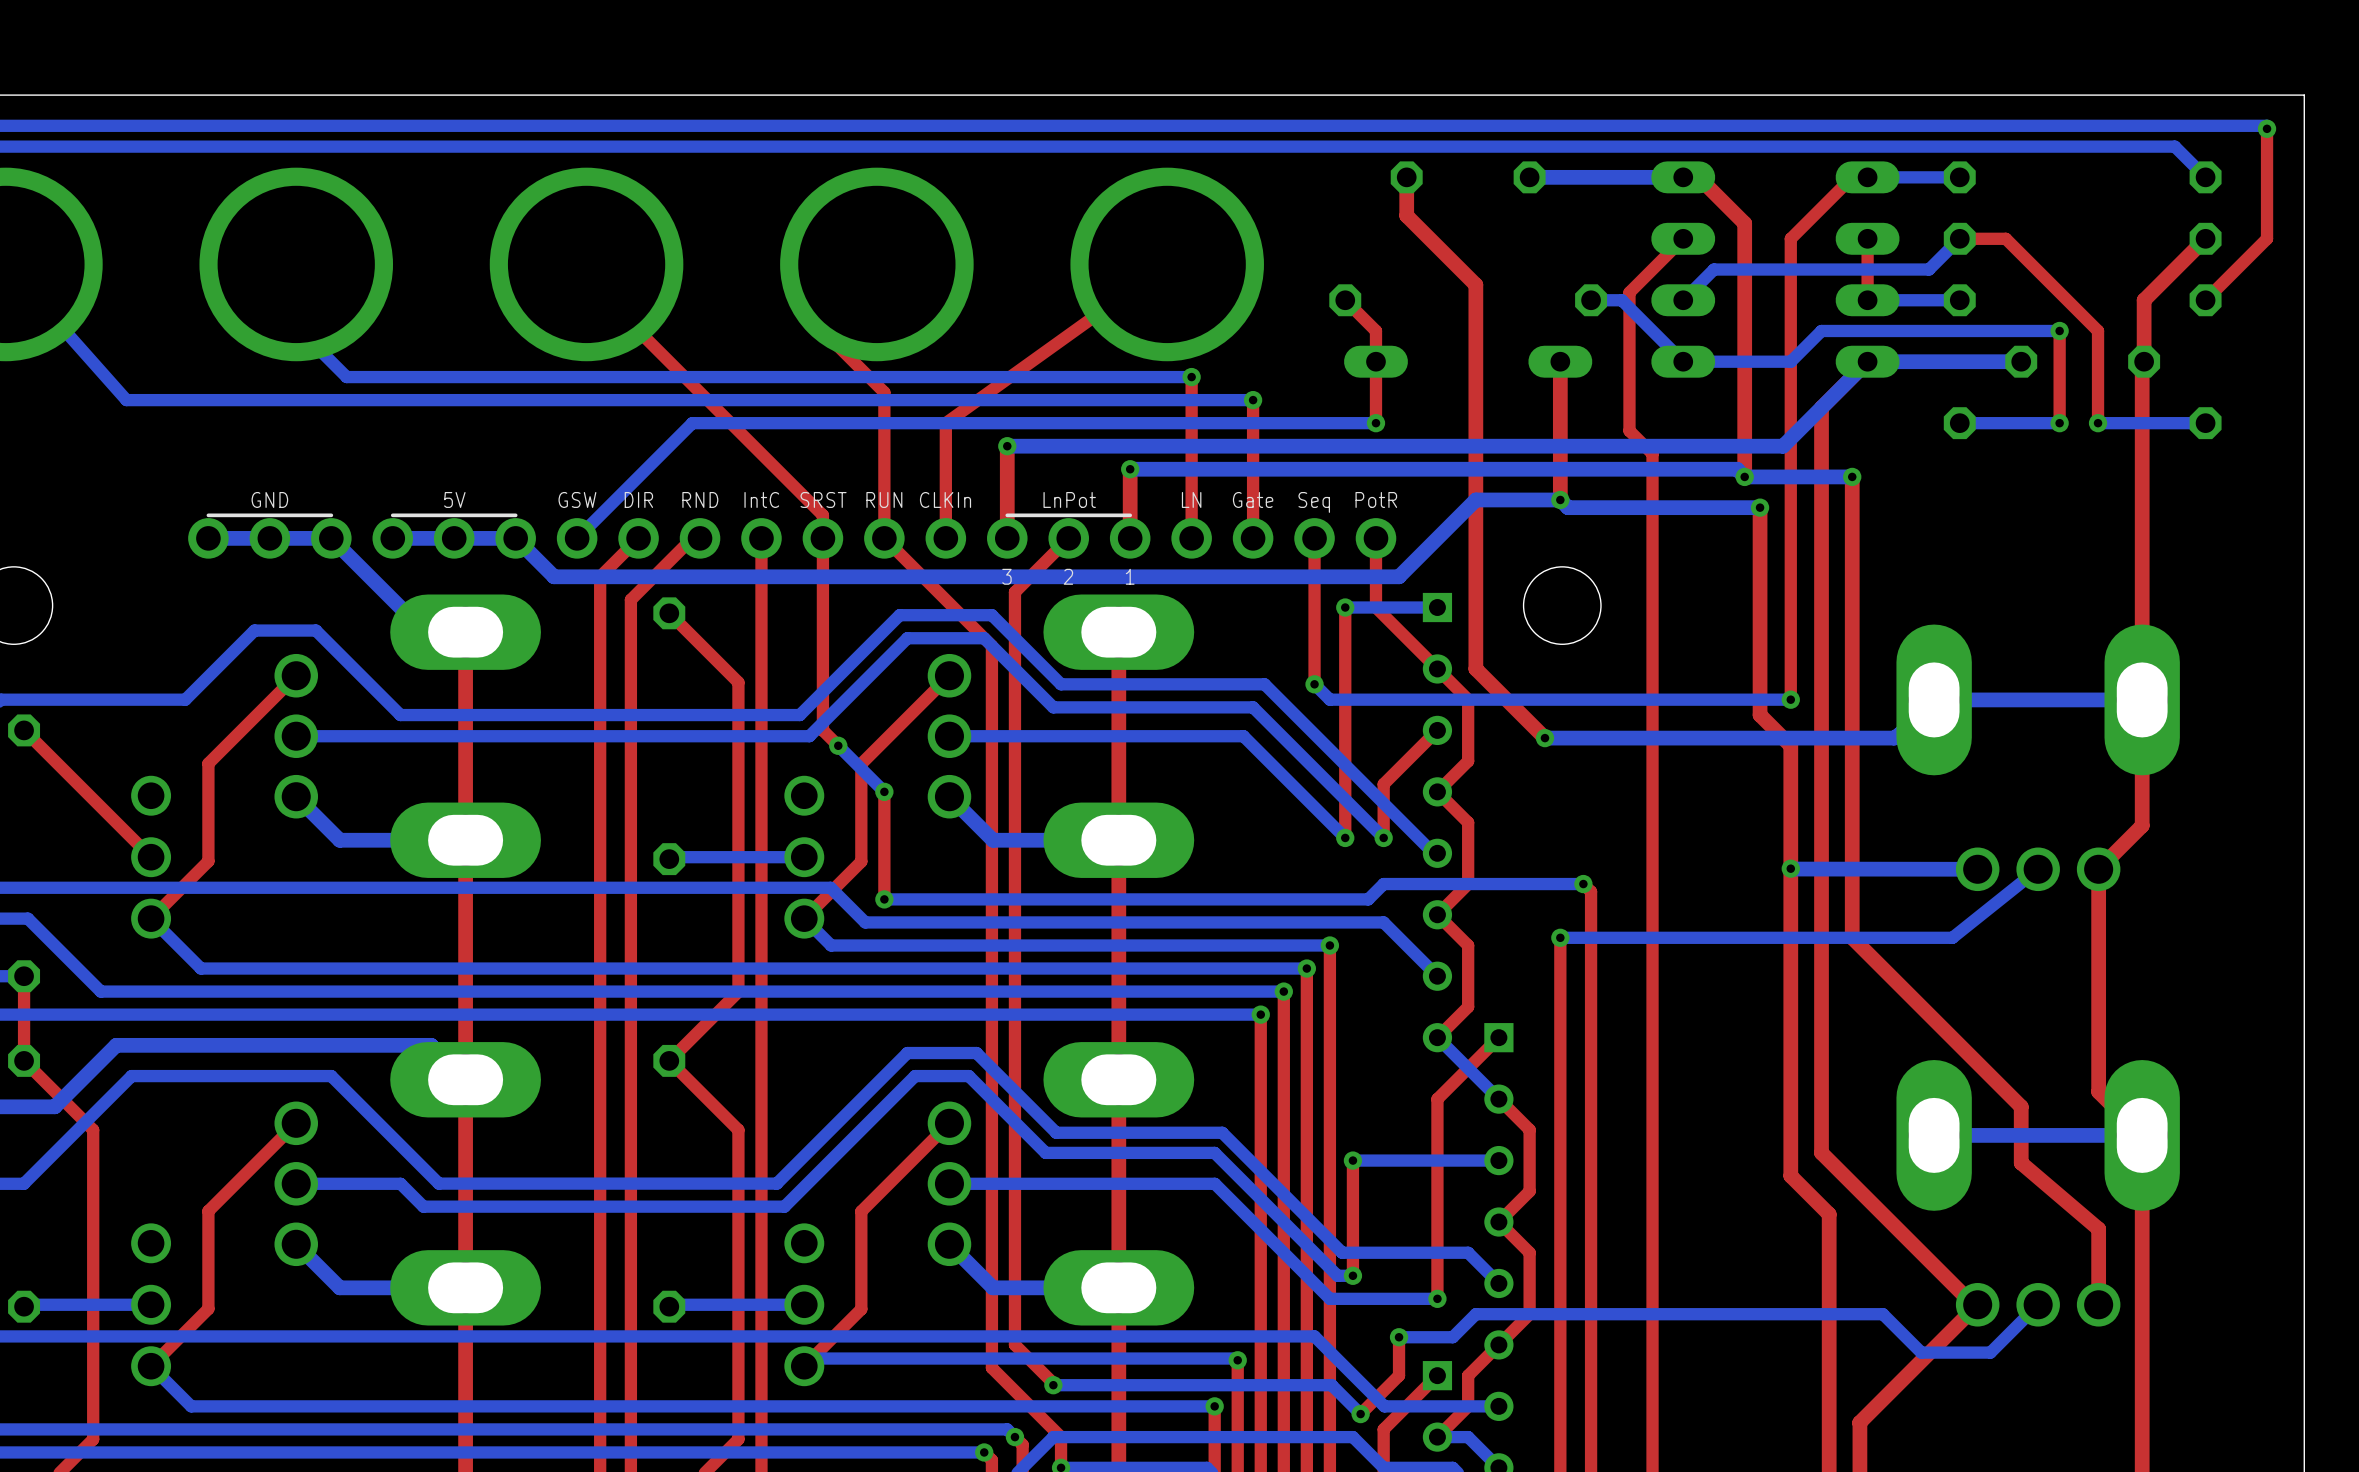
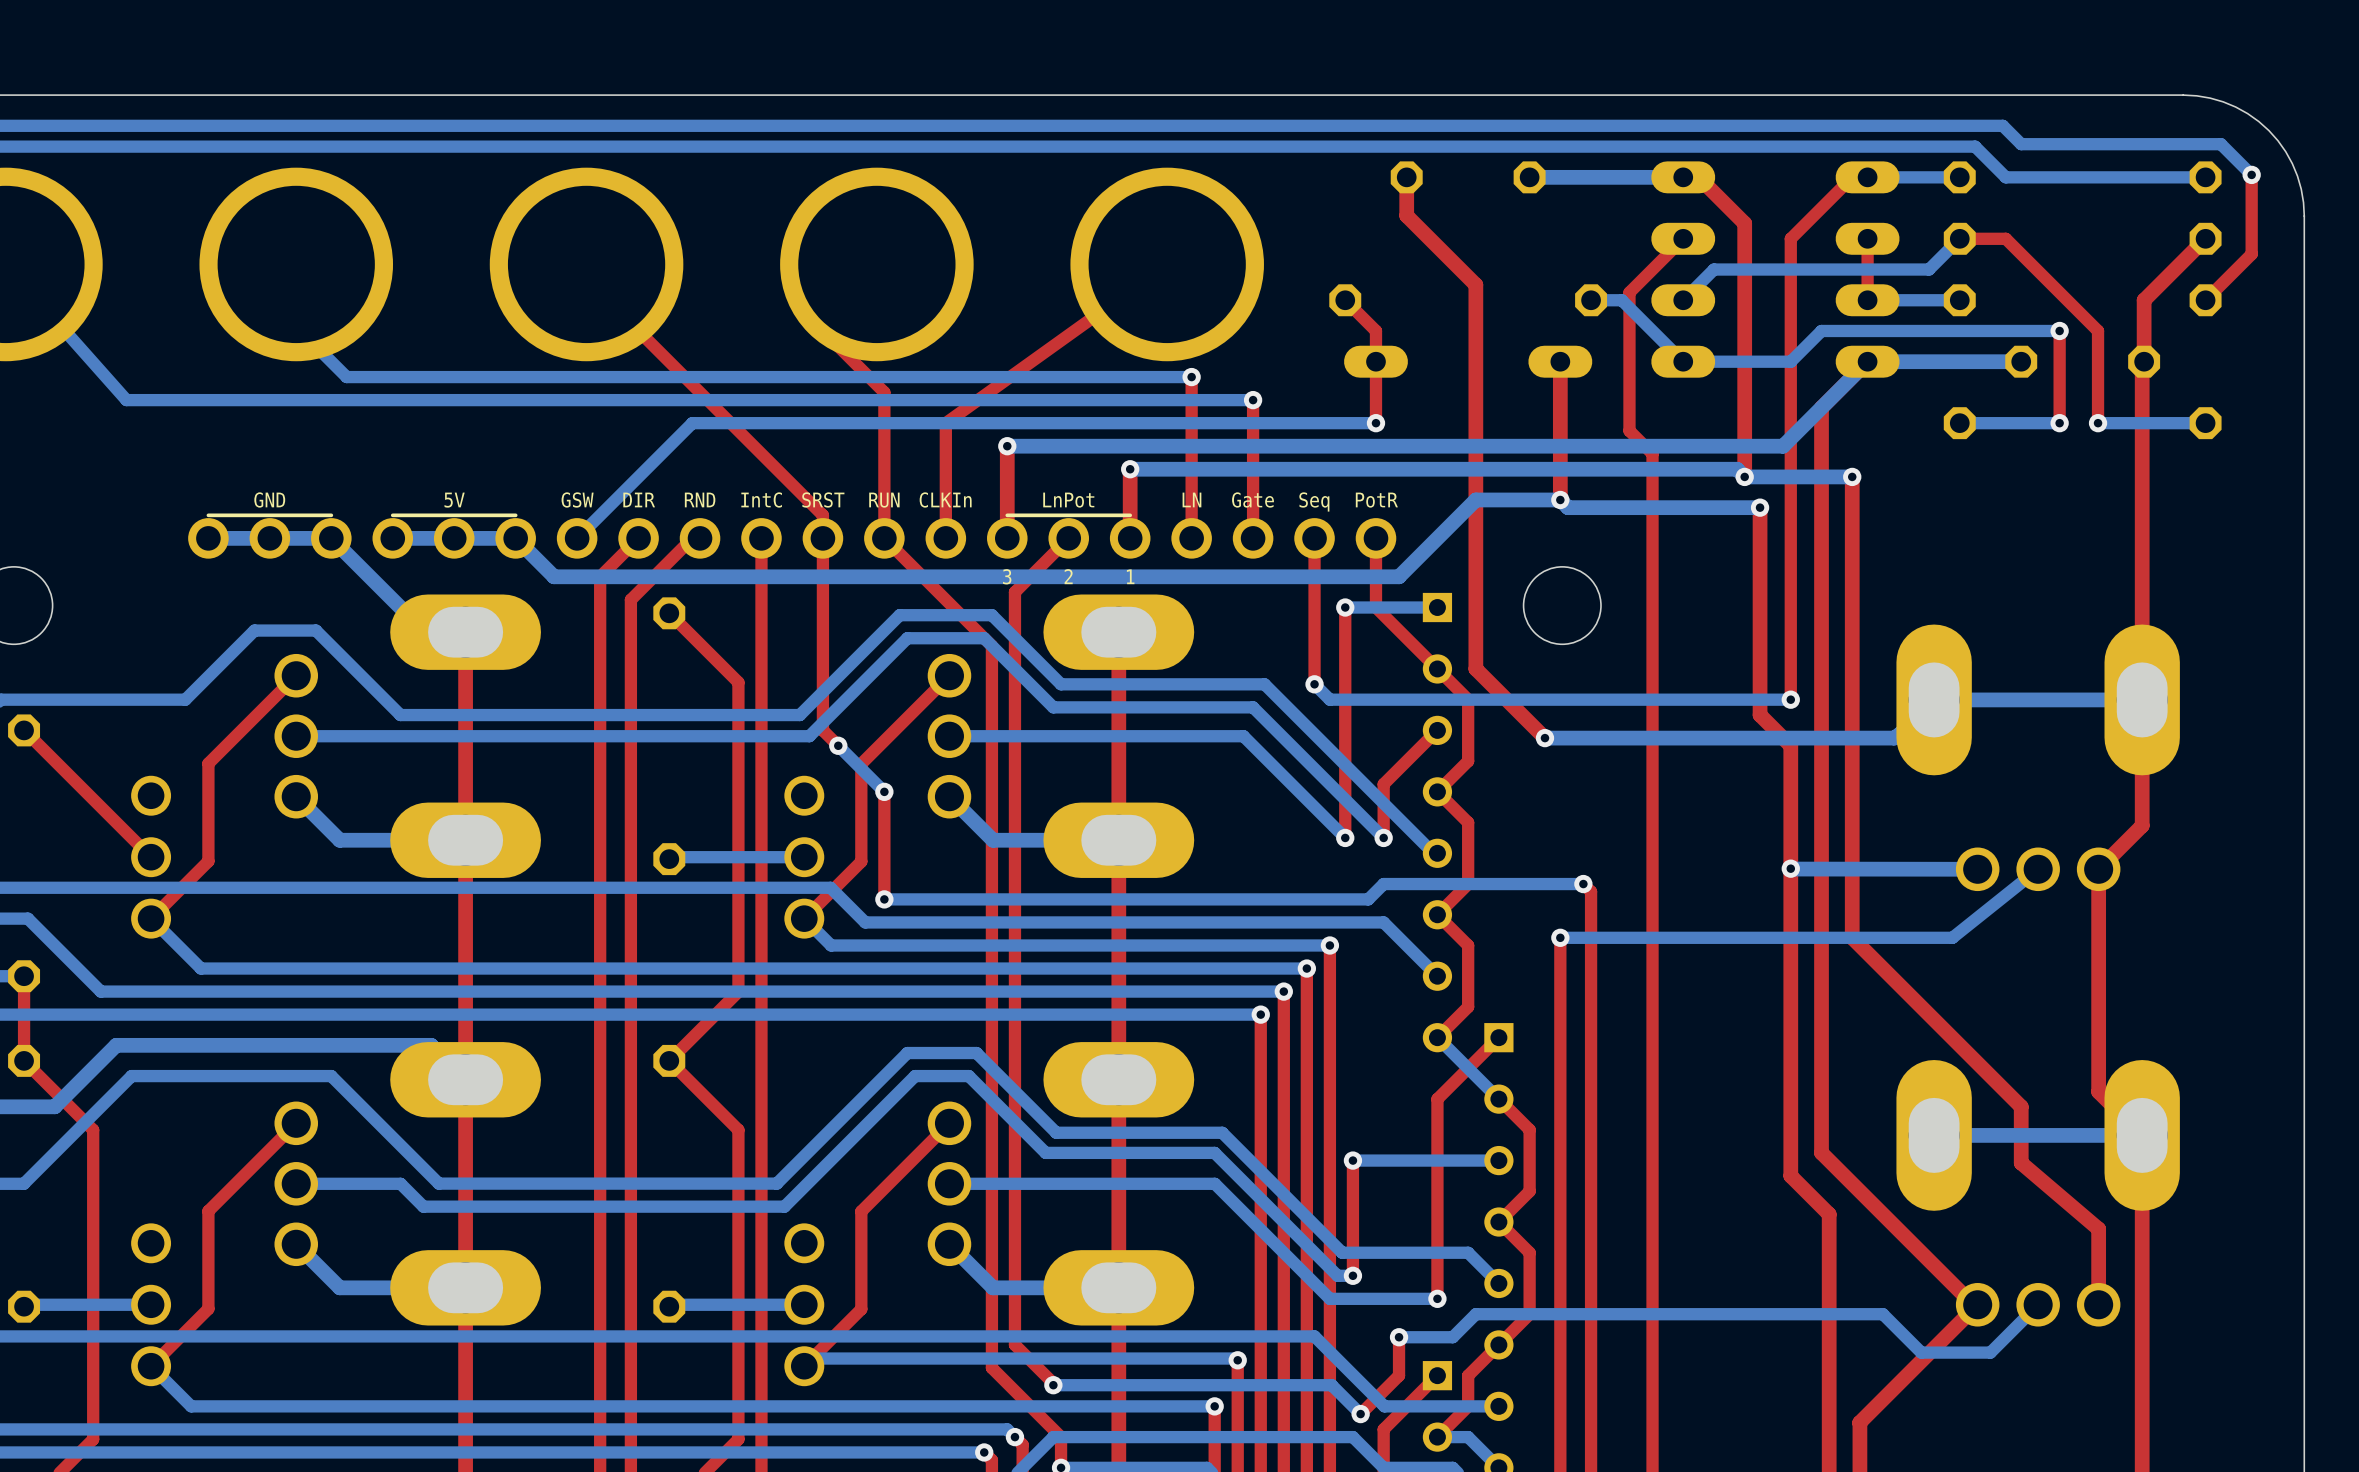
board edge: (2183, 95) (2304, 95) (2304, 216) -> (2183, 95) (2196, 95) (2223, 101) (2247, 113) (2268, 130) (2285, 151) (2297, 176) (2303, 202) (2304, 216)
bottom track: (2002, 125) (2267, 125) (2267, 128) -> (2002, 125) (2021, 144) (2220, 144) (2251, 174)
top track: (2267, 128) (2267, 238) (2251, 254) -> (2251, 174) (2251, 254)
via position: (2267, 128) -> (2251, 174)
bottom track: (1975, 146) (2174, 146) (2205, 177) -> (1975, 146) (2005, 177) (2205, 177)

